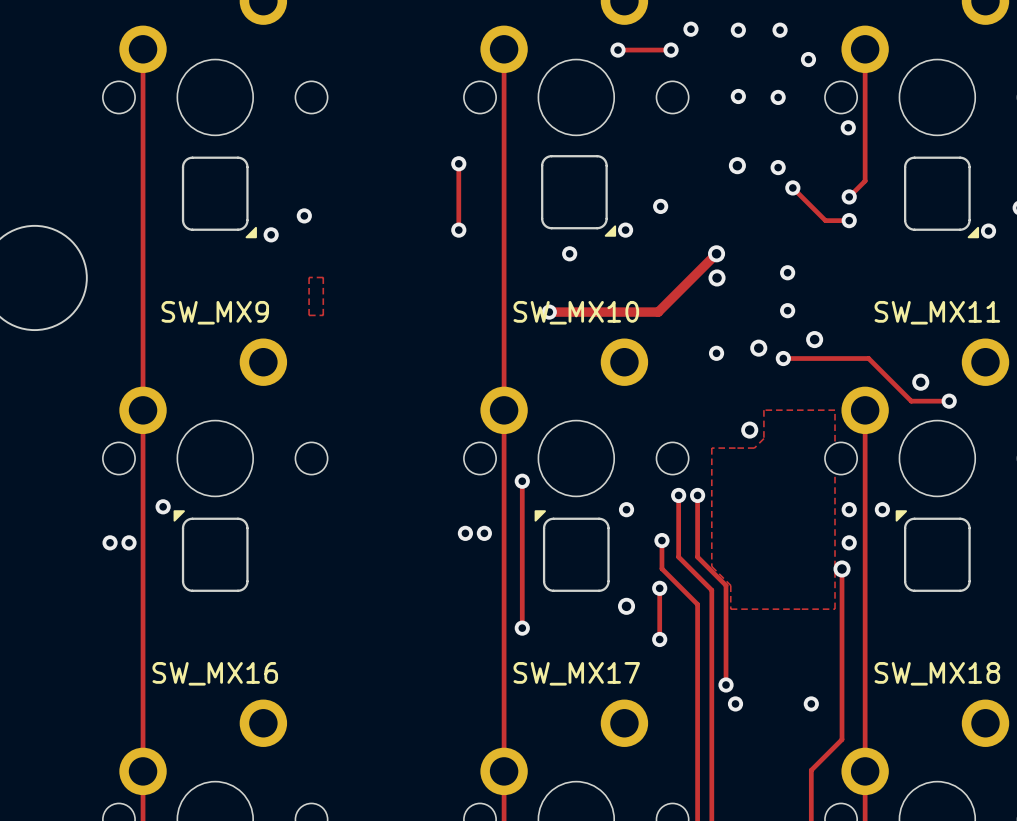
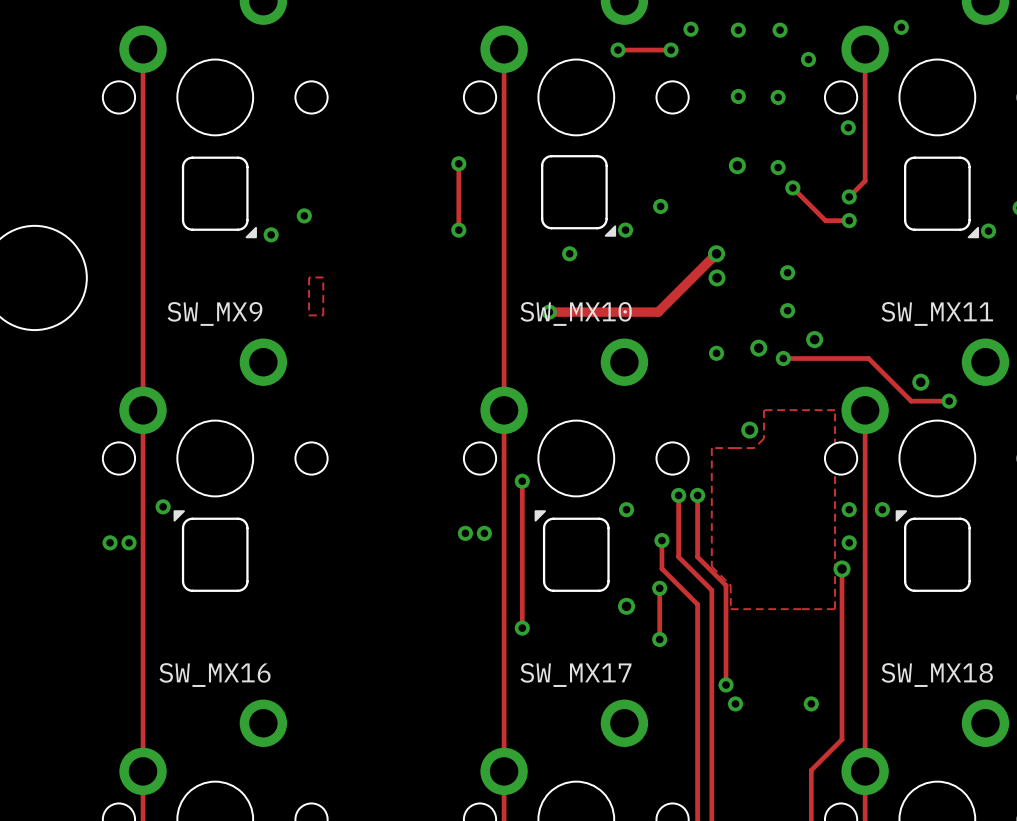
via: none -> (901, 27)

